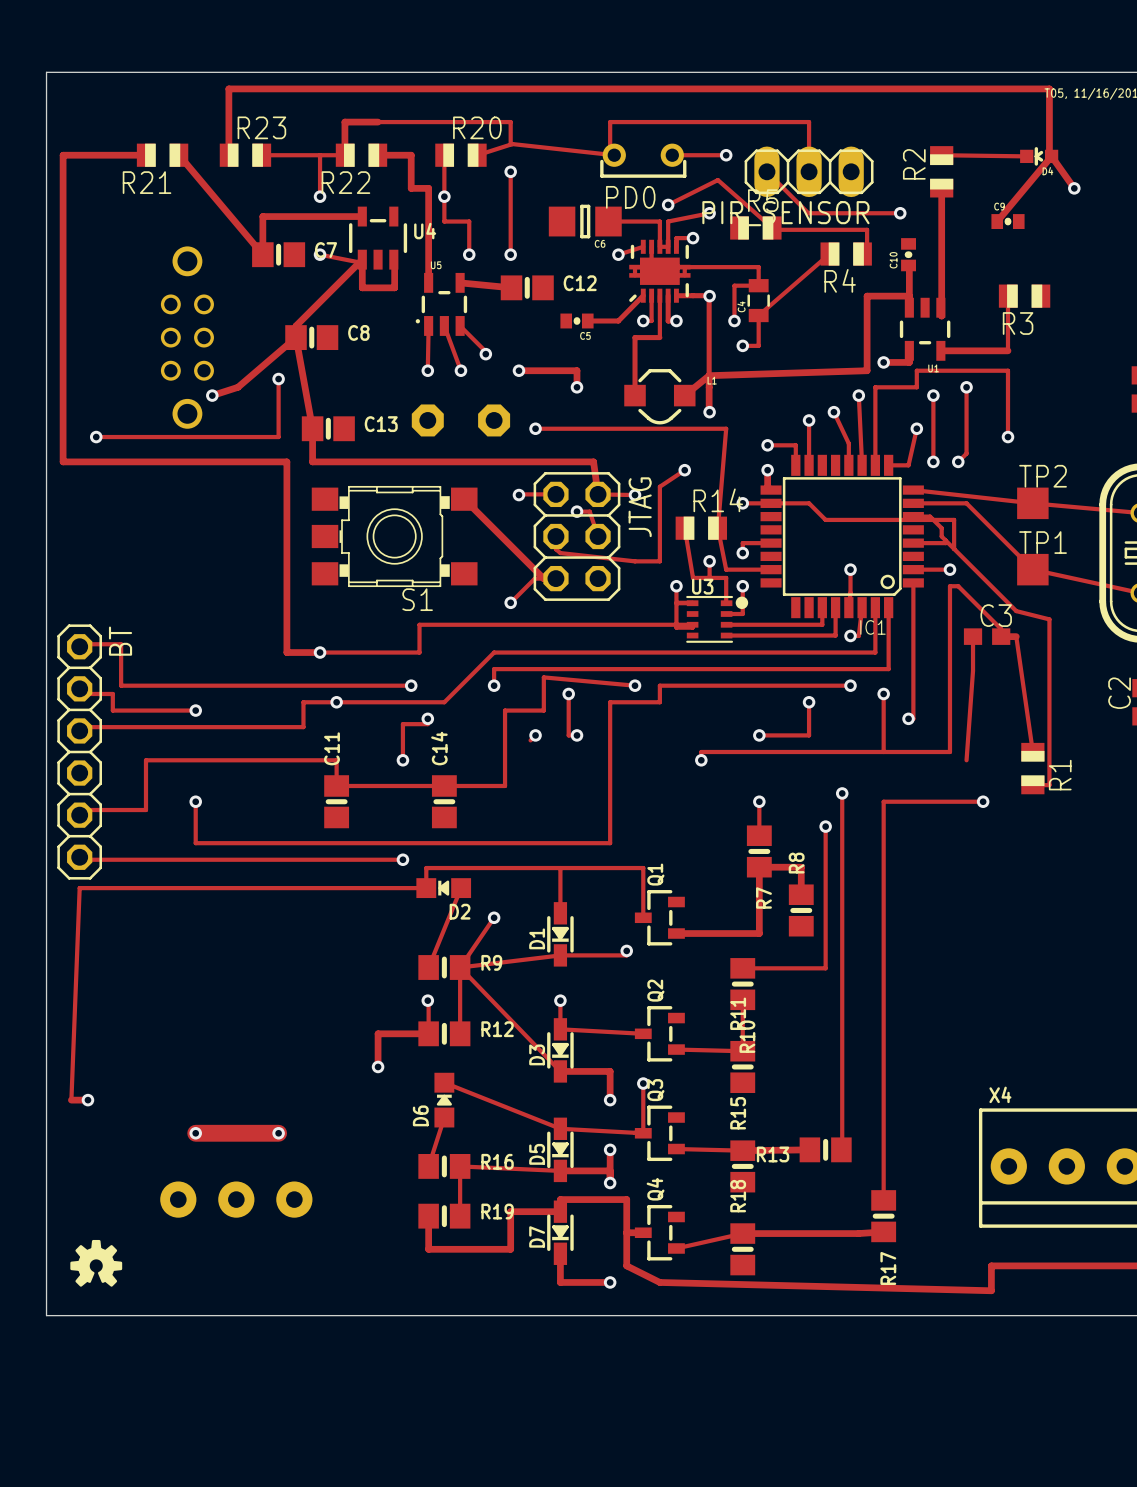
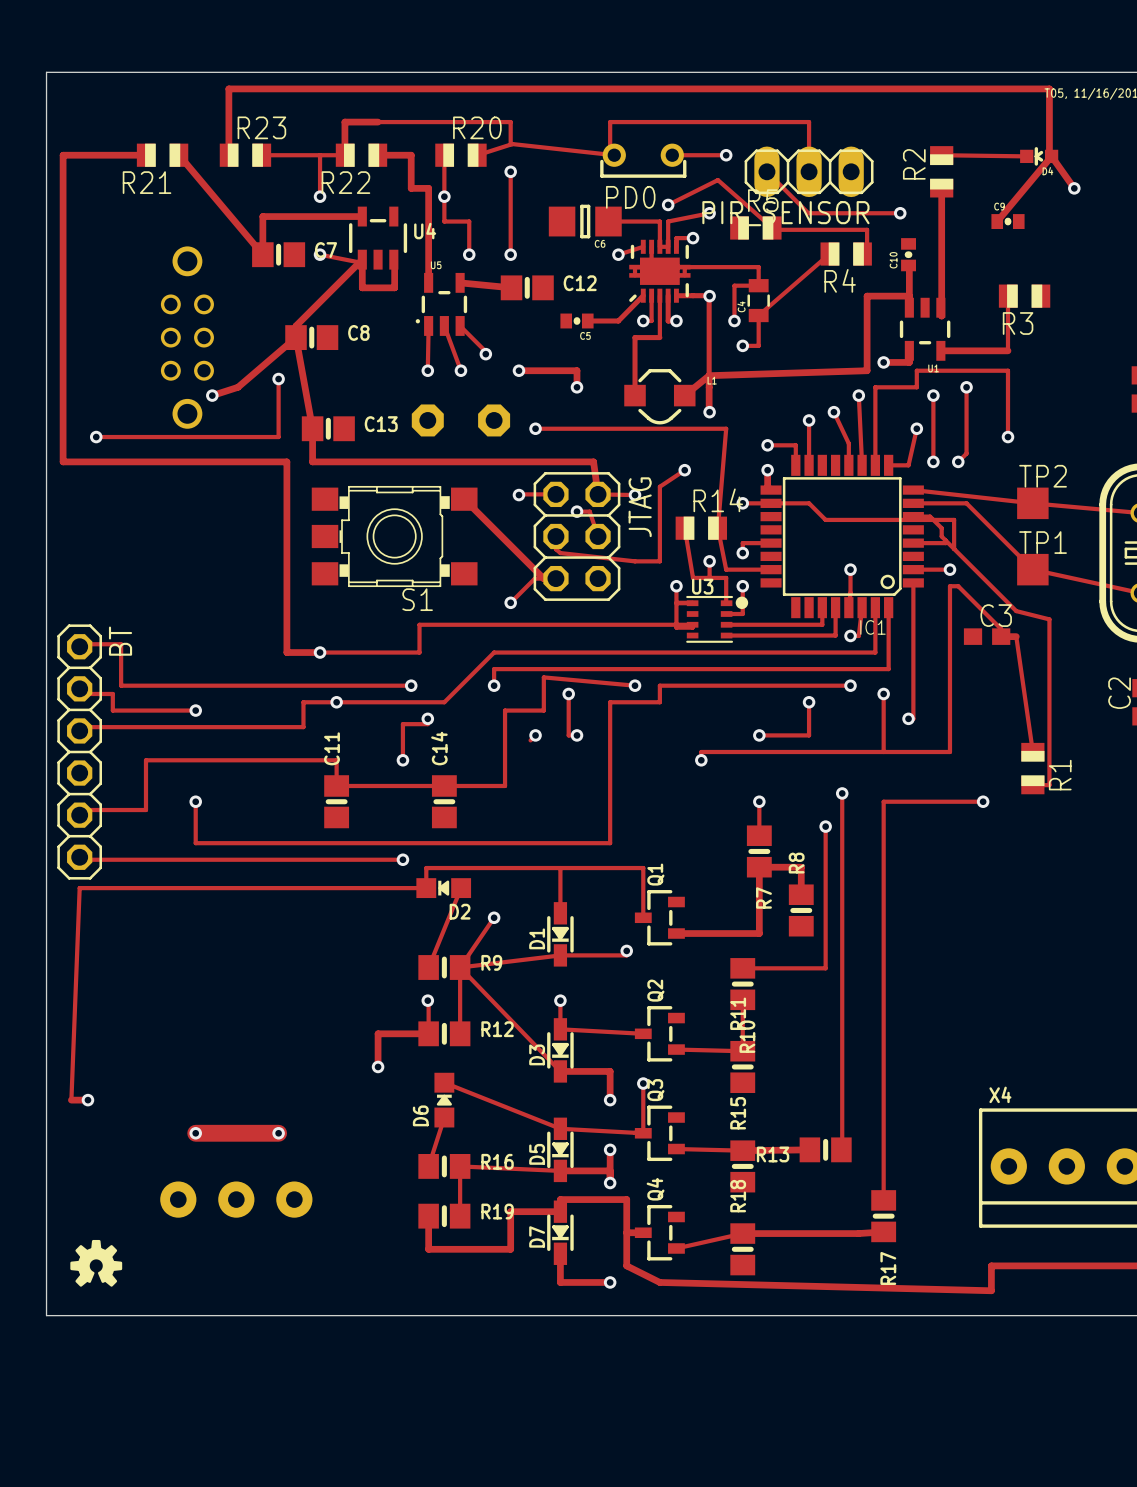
track: (973, 636) (973, 670) (966, 760) -> none

